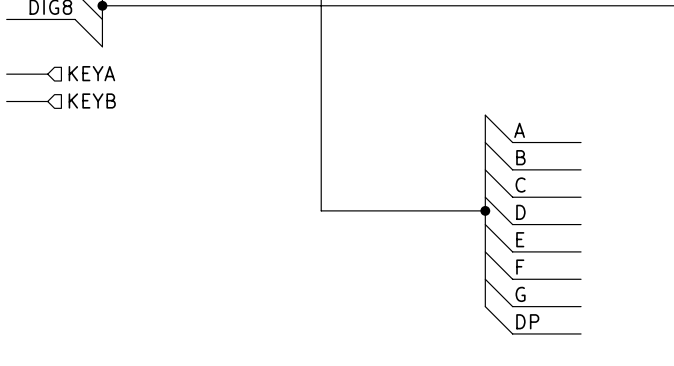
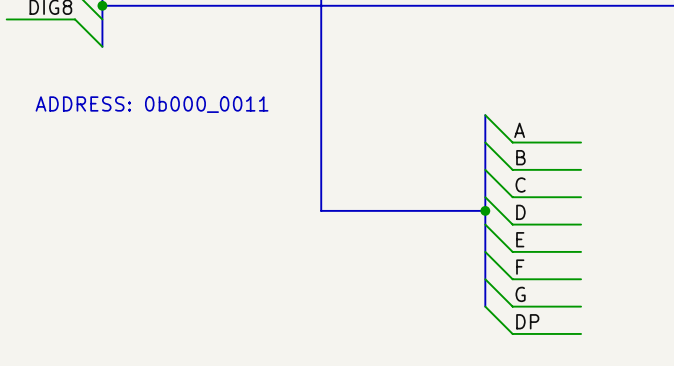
hierarchical label: KEYA (91, 73) -> none
wire: (6, 74) (47, 74) -> none
hierarchical label: KEYB (92, 100) -> none
wire: (6, 101) (47, 101) -> none
text: none -> ADDRESS: 0b000_0011 (152, 104)

